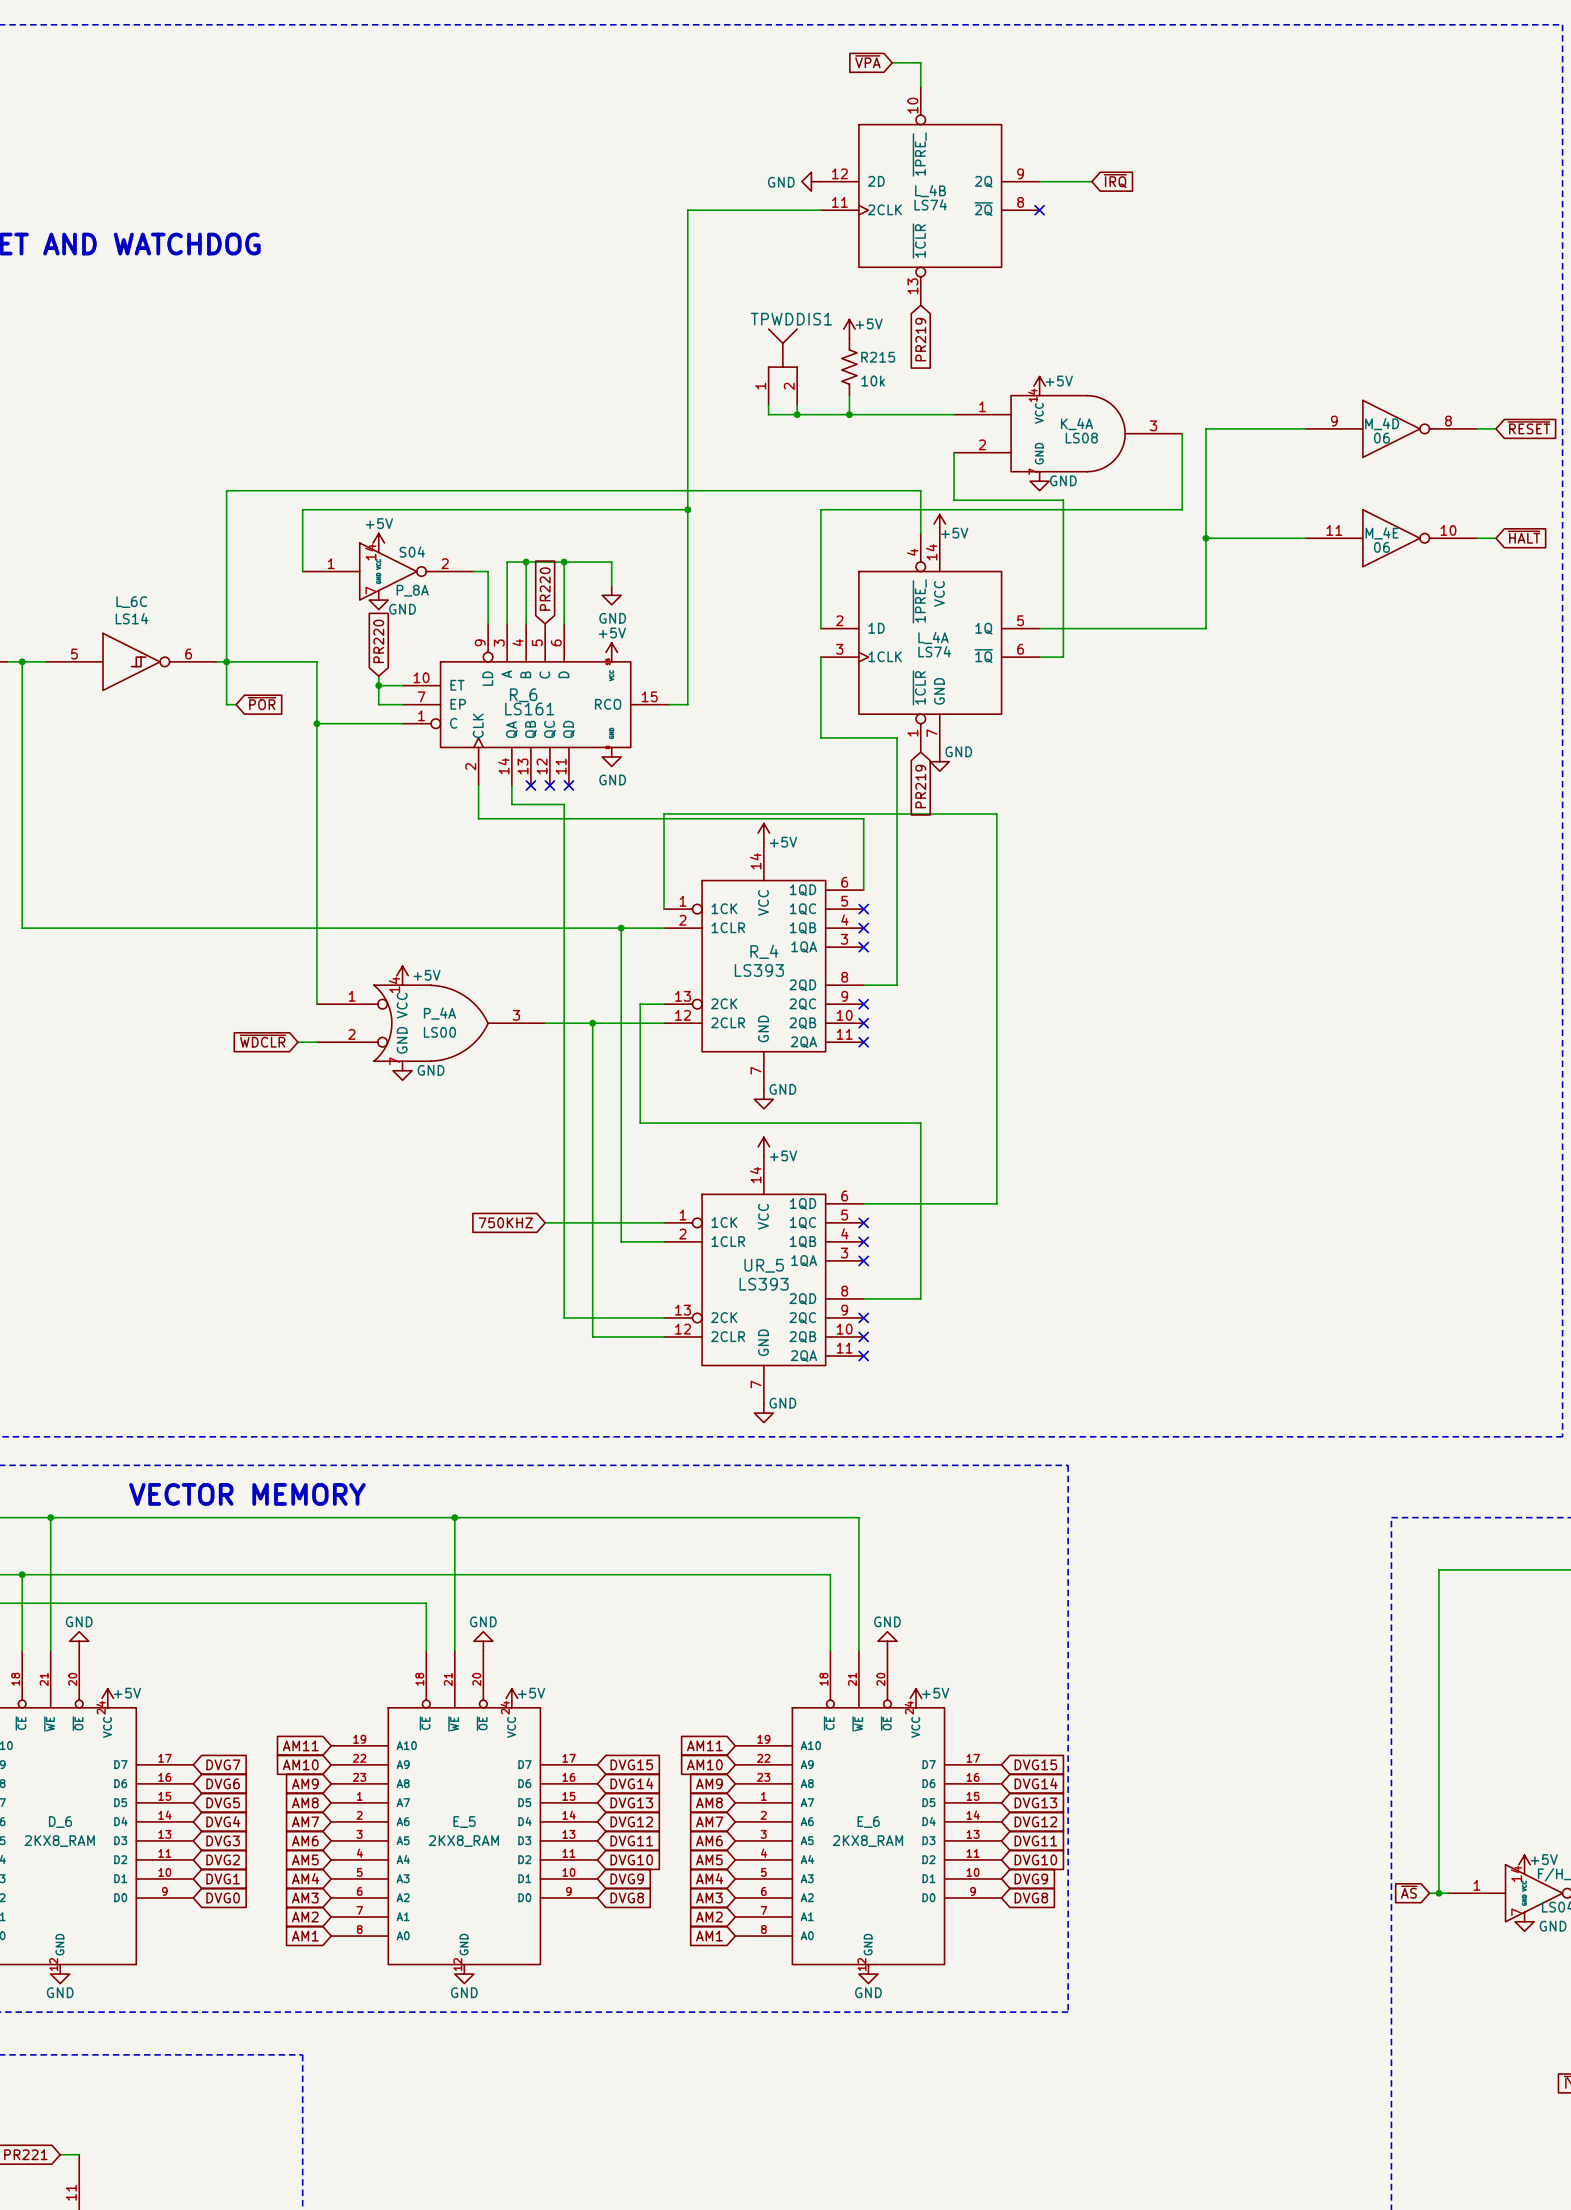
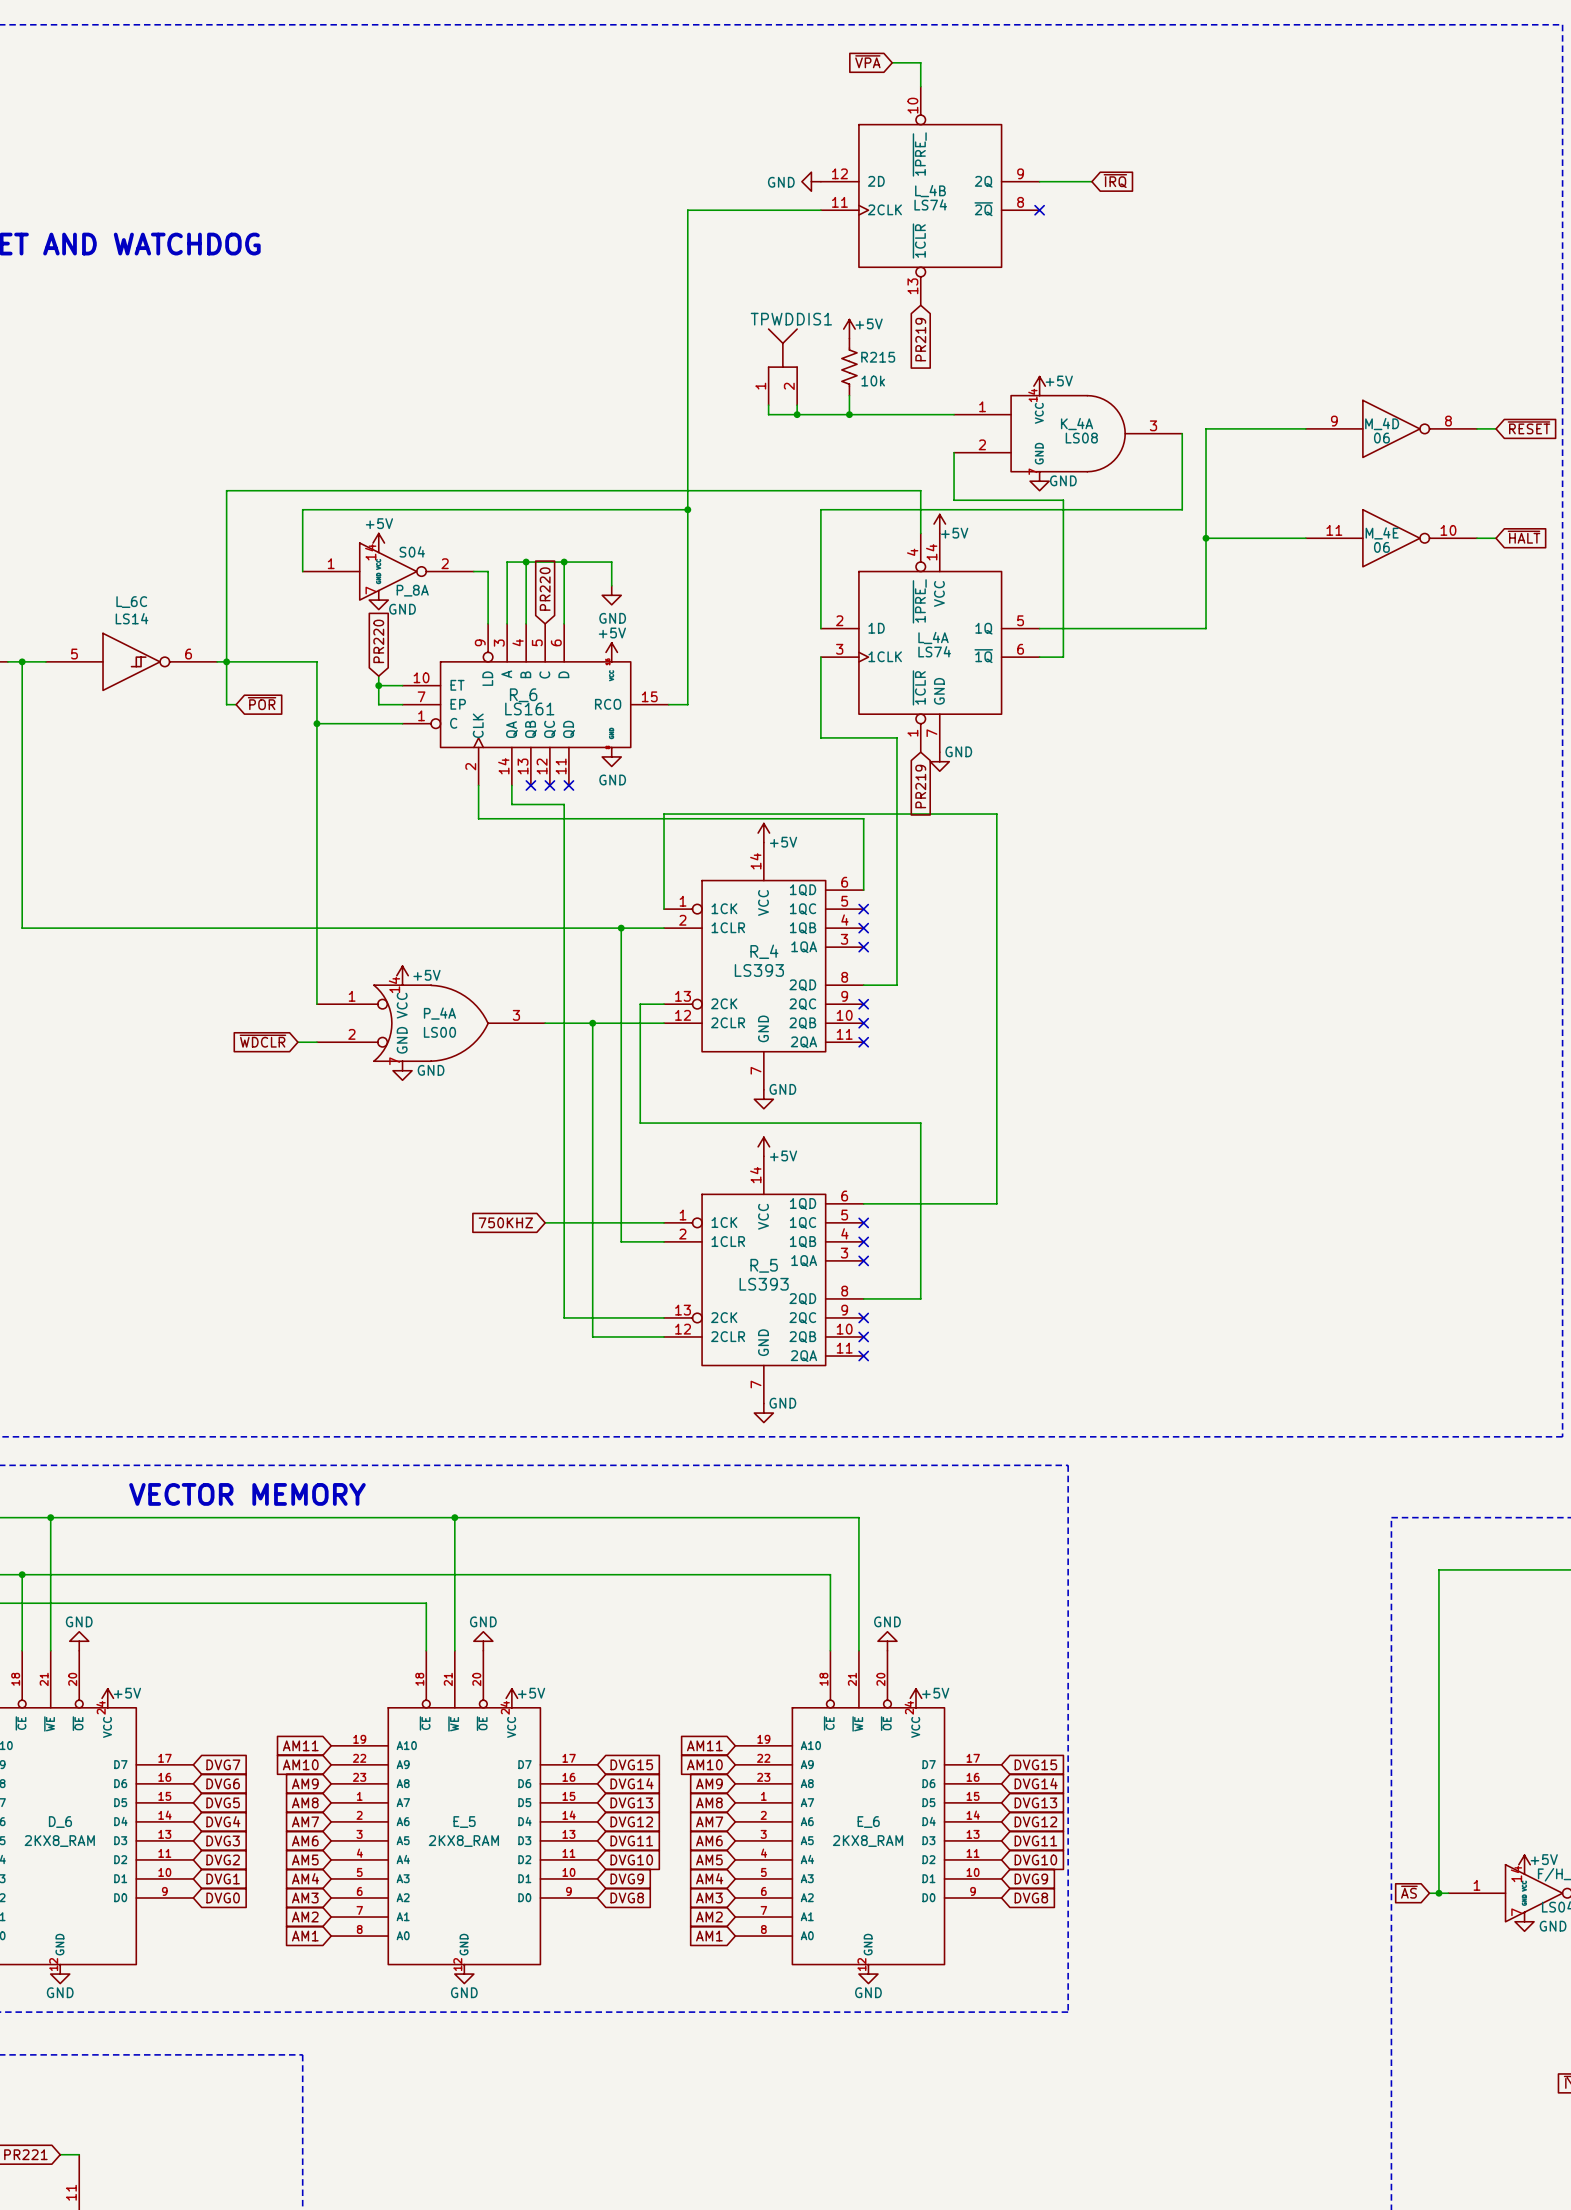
UR_5 name: UR_5 (764, 1265) -> R_5 (764, 1265)

